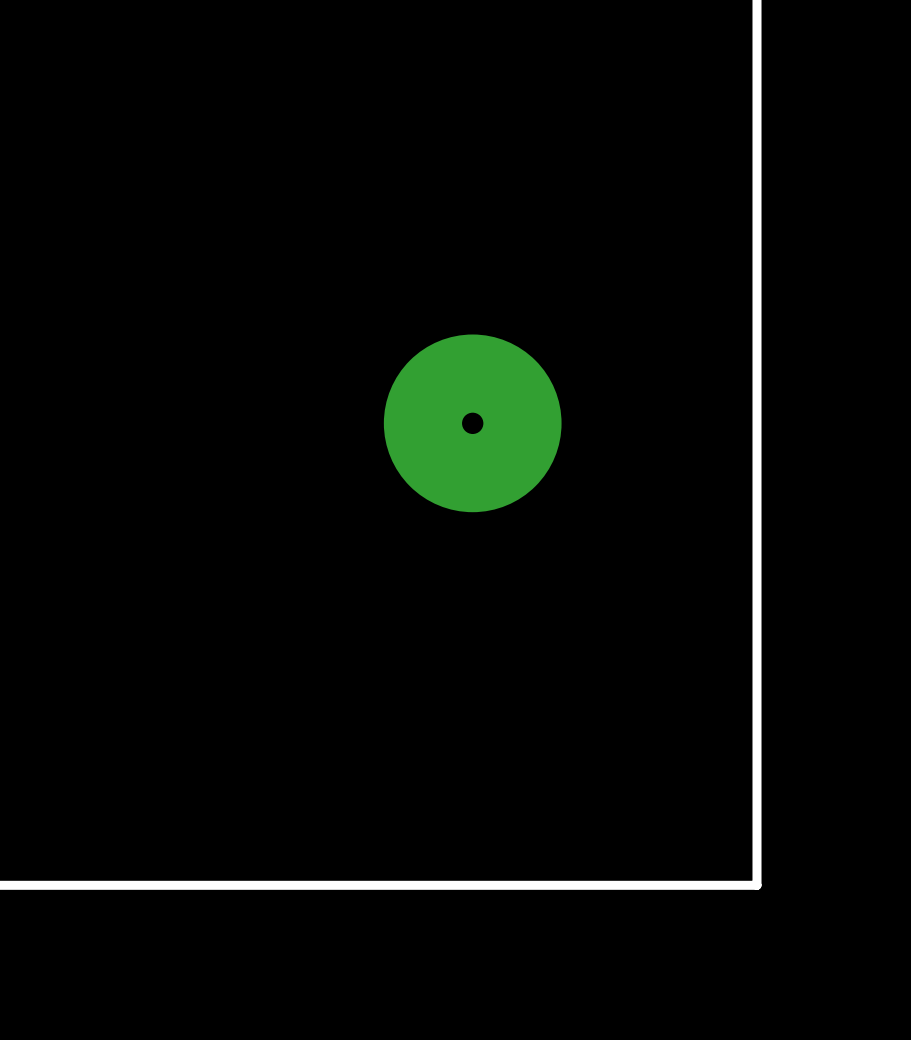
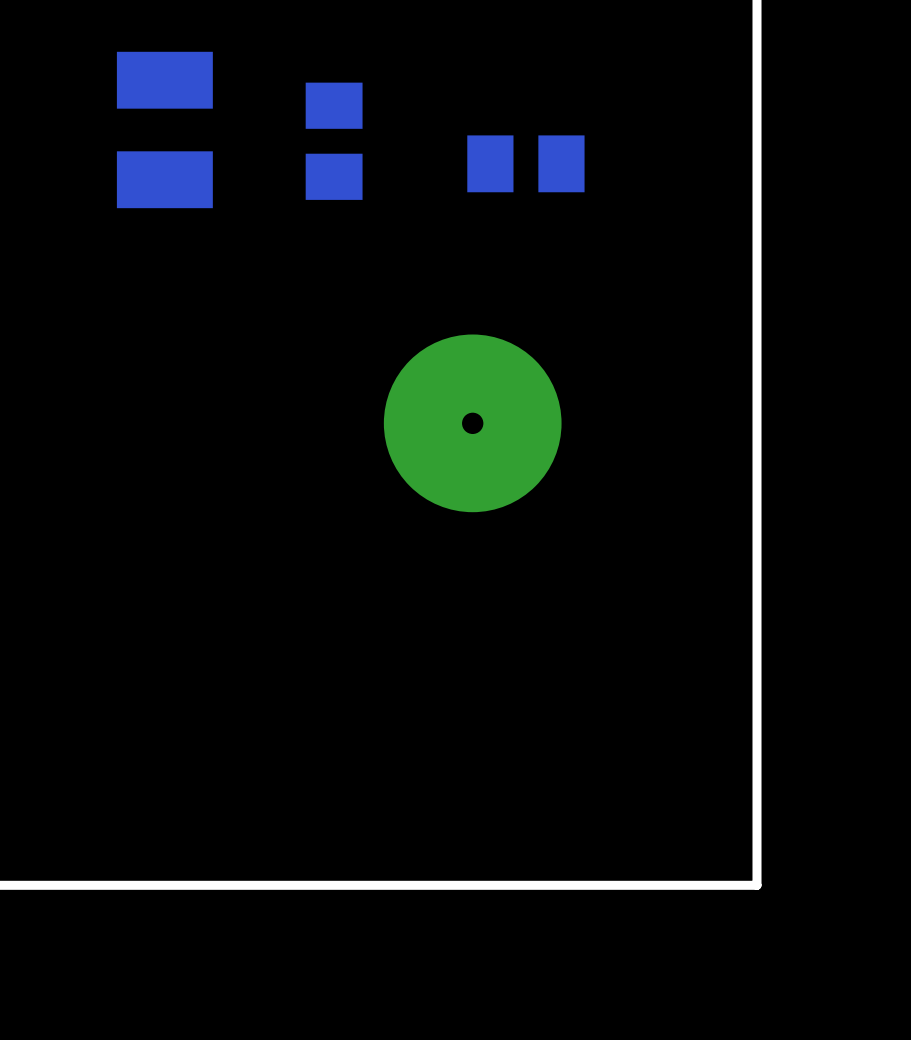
part: none -> (164, 129)
part: none -> (334, 141)
part: none -> (525, 163)

